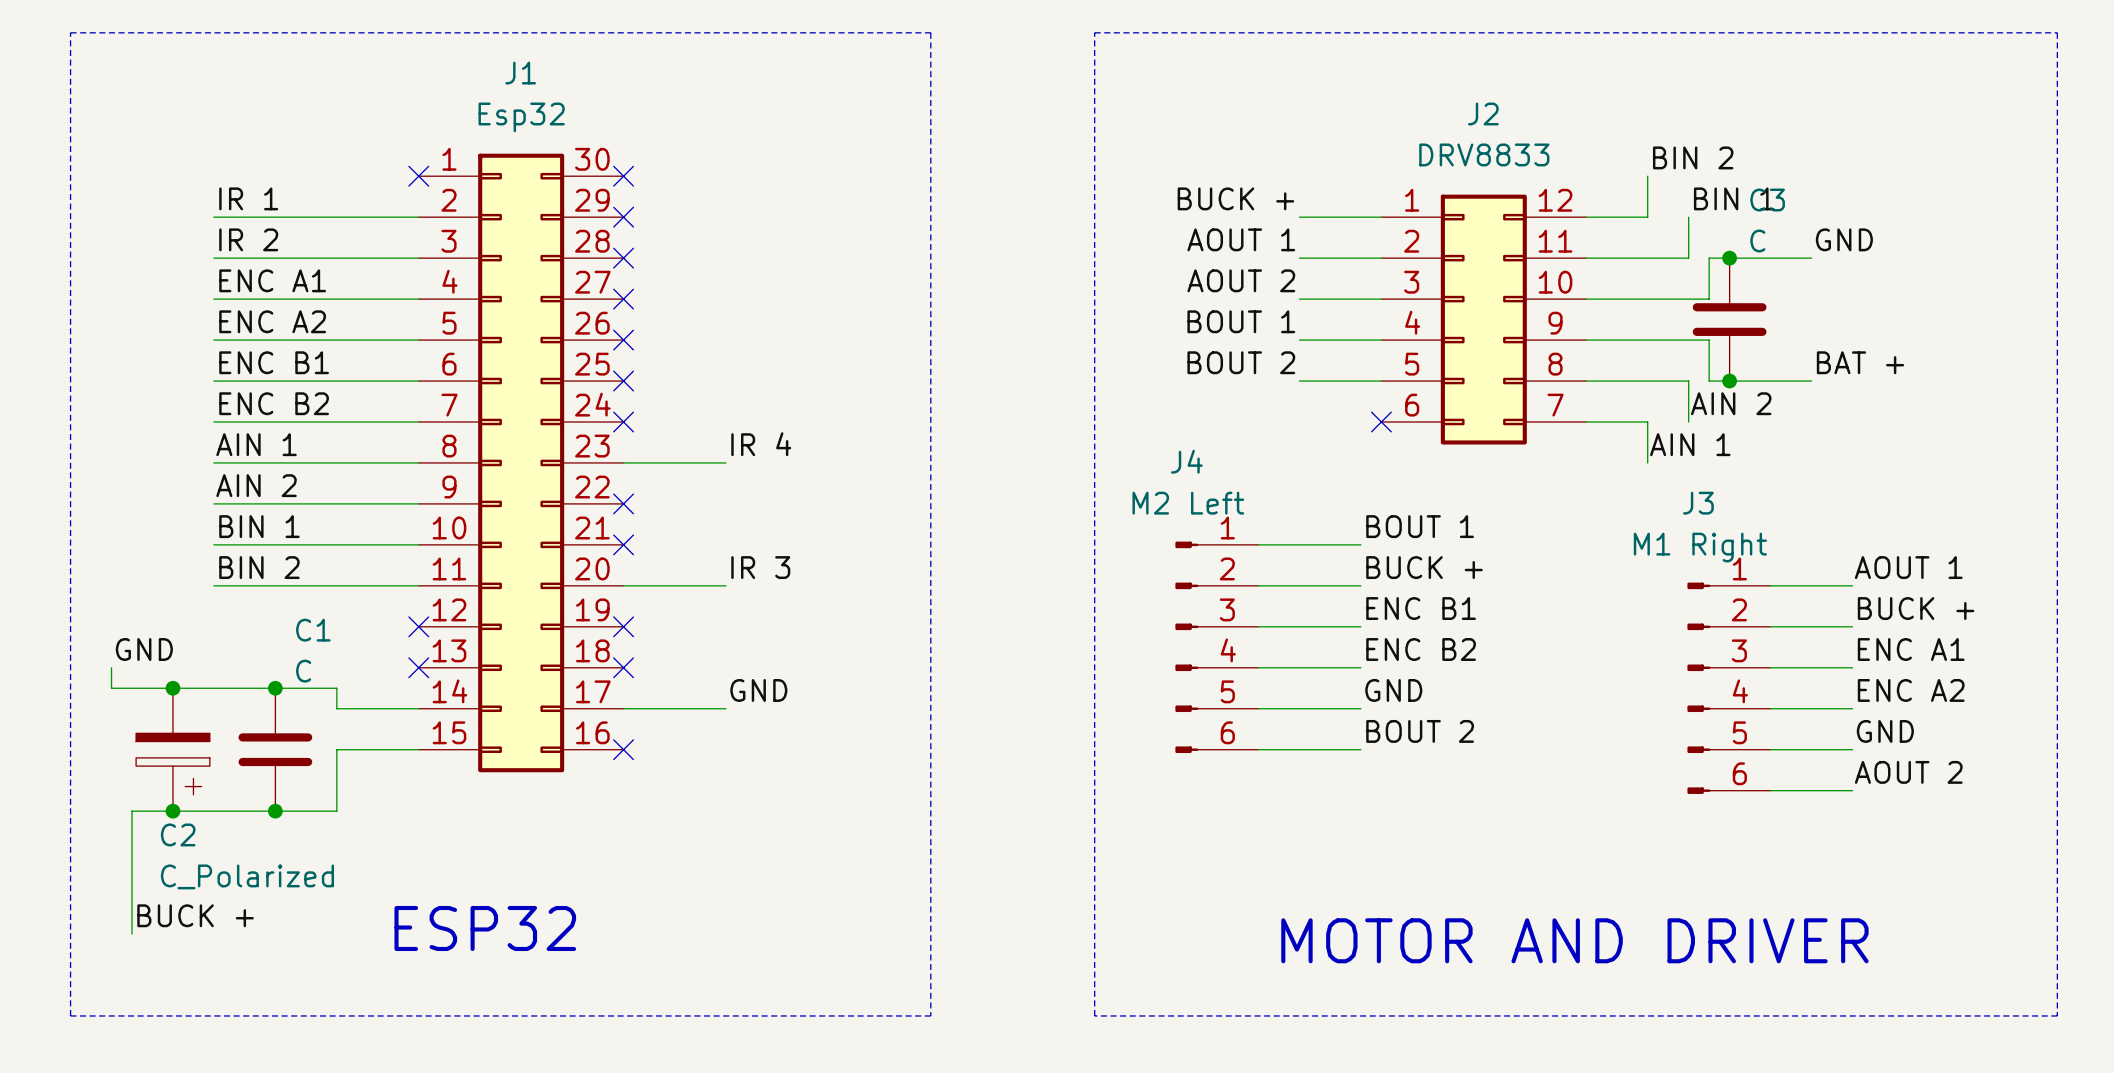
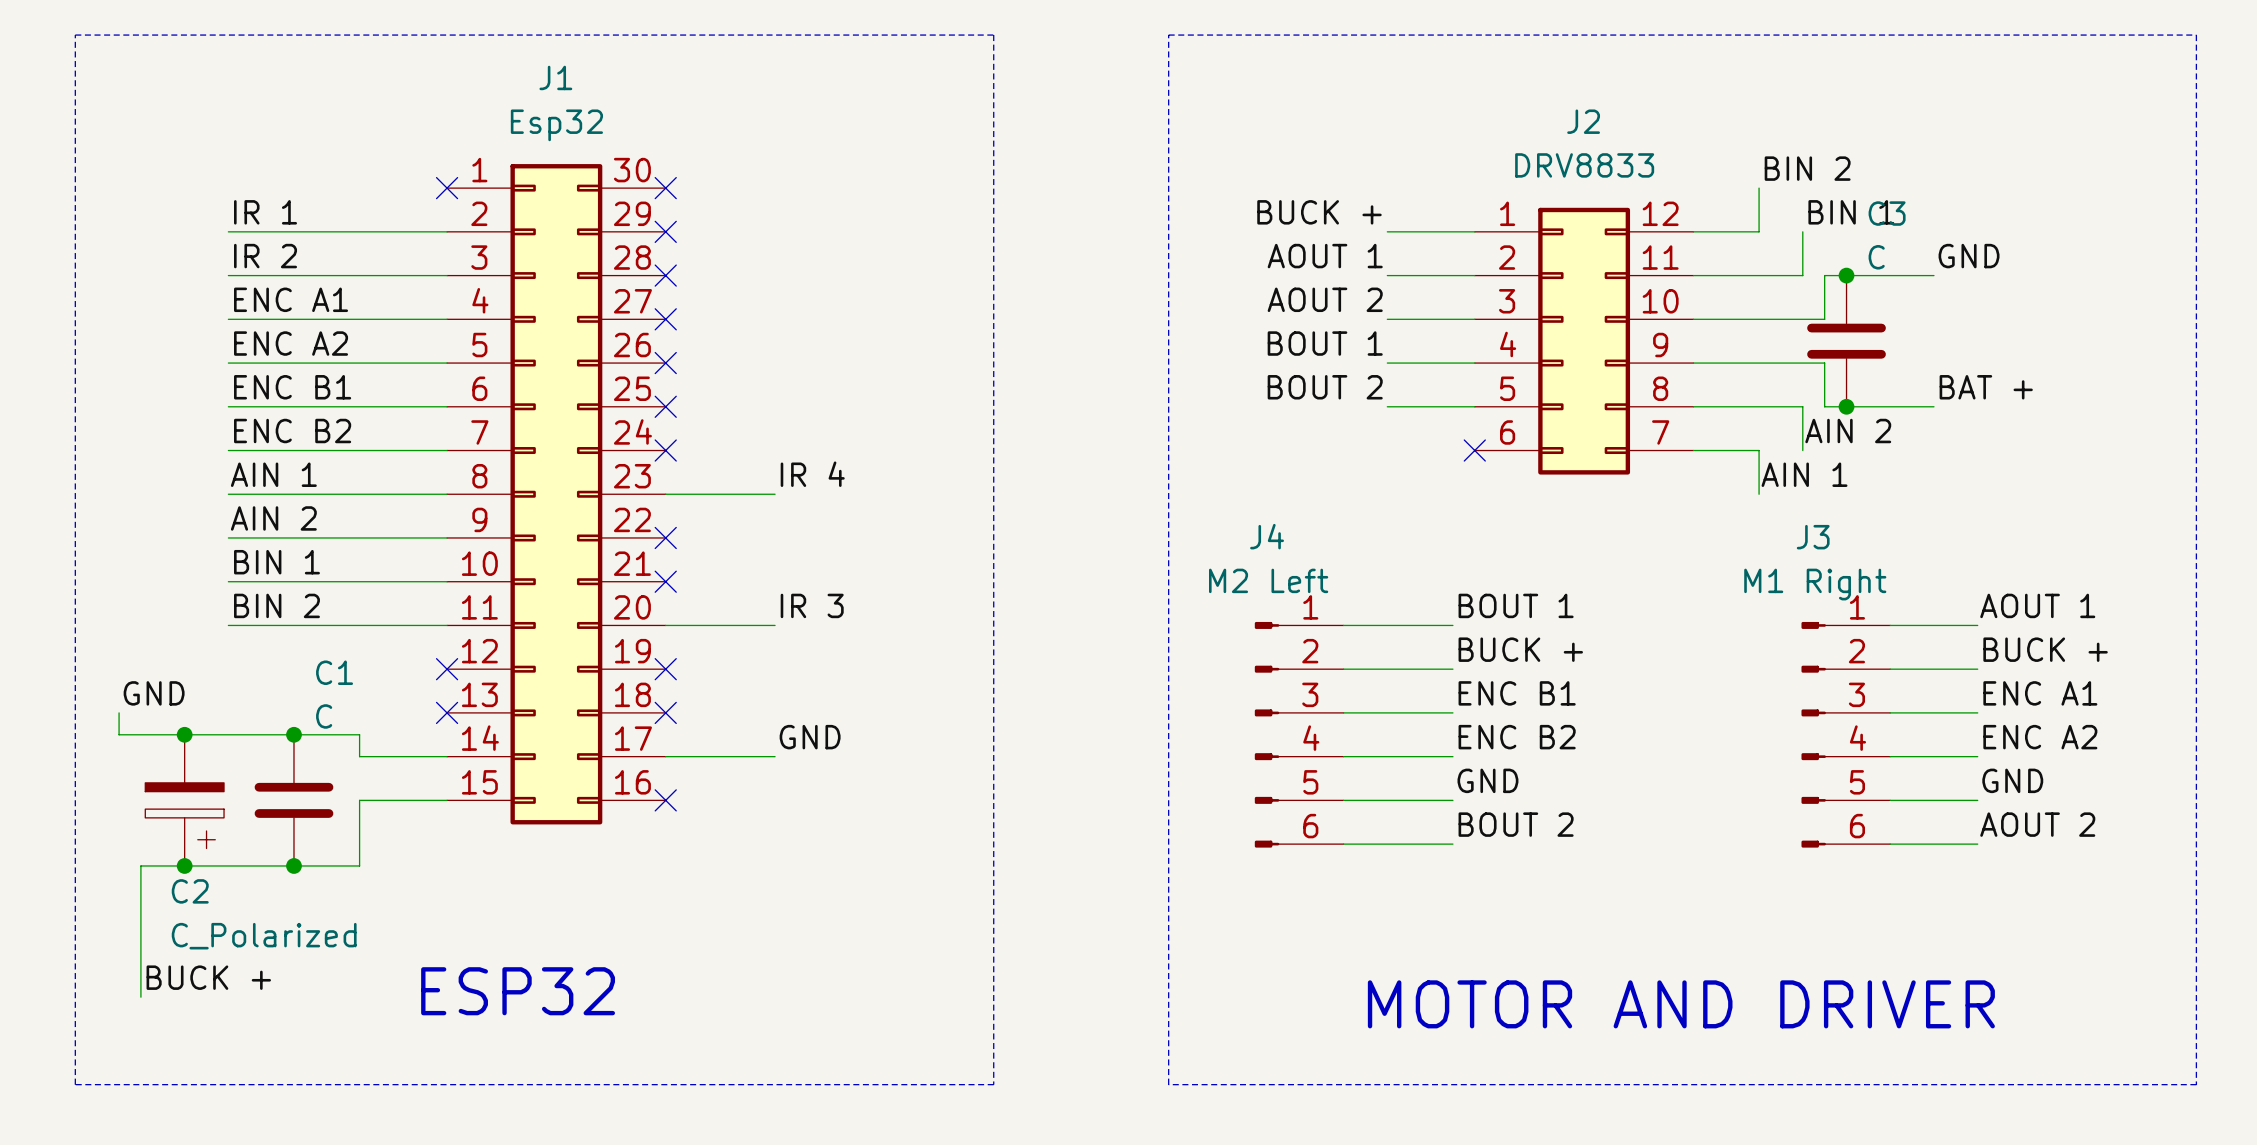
label: BOUT 1 (1420, 526) -> none
wire: (1258, 544) (1360, 544) -> (1343, 844) (1452, 844)
label: BUCK + (1424, 567) -> BOUT 1 (1516, 605)
label: ENC B1 (1421, 608) -> BUCK + (1520, 649)
J4 position: (1216, 647) -> (1299, 734)
label: ENC B2 (1421, 649) -> ENC B1 (1517, 693)
label: GND (1393, 690) -> ENC B2 (1517, 737)
label: BOUT 2 (1420, 731) -> GND (1487, 780)
label: none -> BOUT 2 (1516, 824)

